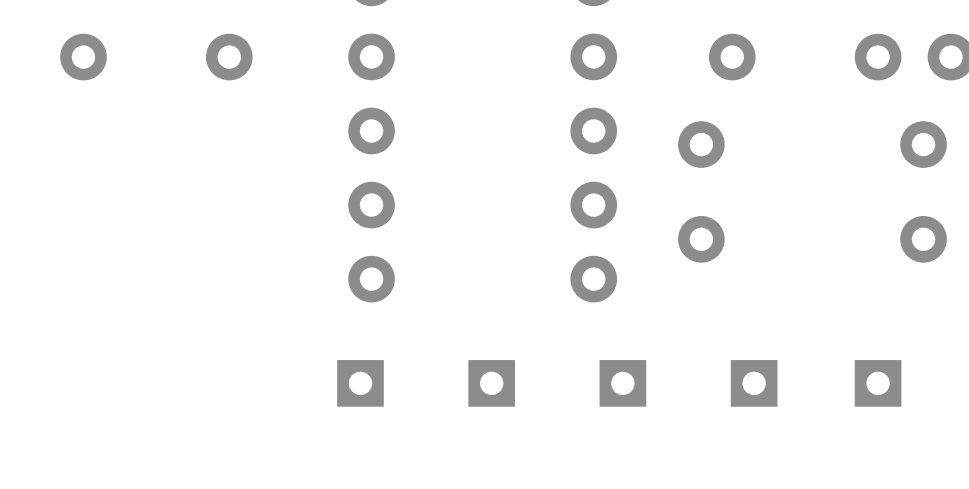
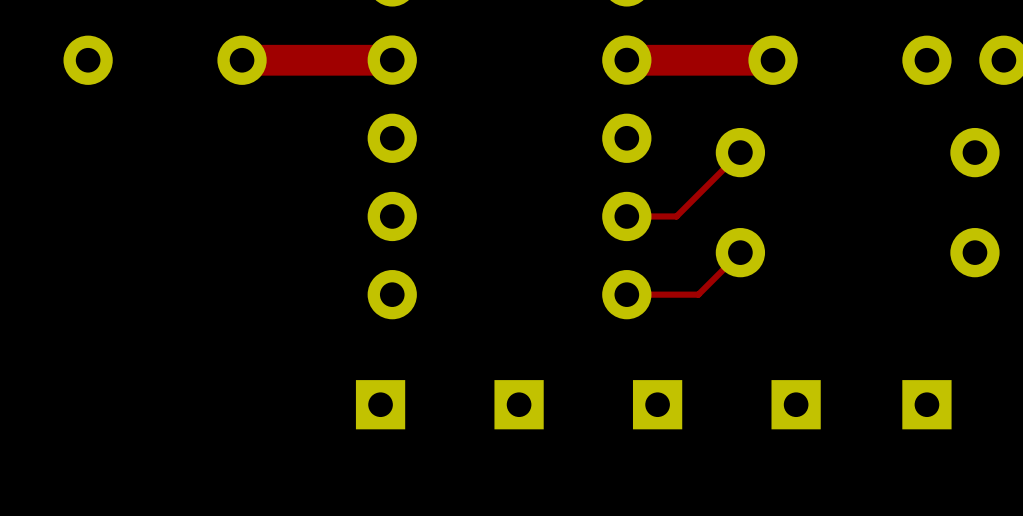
track: none -> (242, 60) (392, 60)
track: none -> (626, 60) (773, 60)
track: none -> (740, 152) (676, 216) (626, 216)
track: none -> (740, 252) (698, 294) (626, 294)

